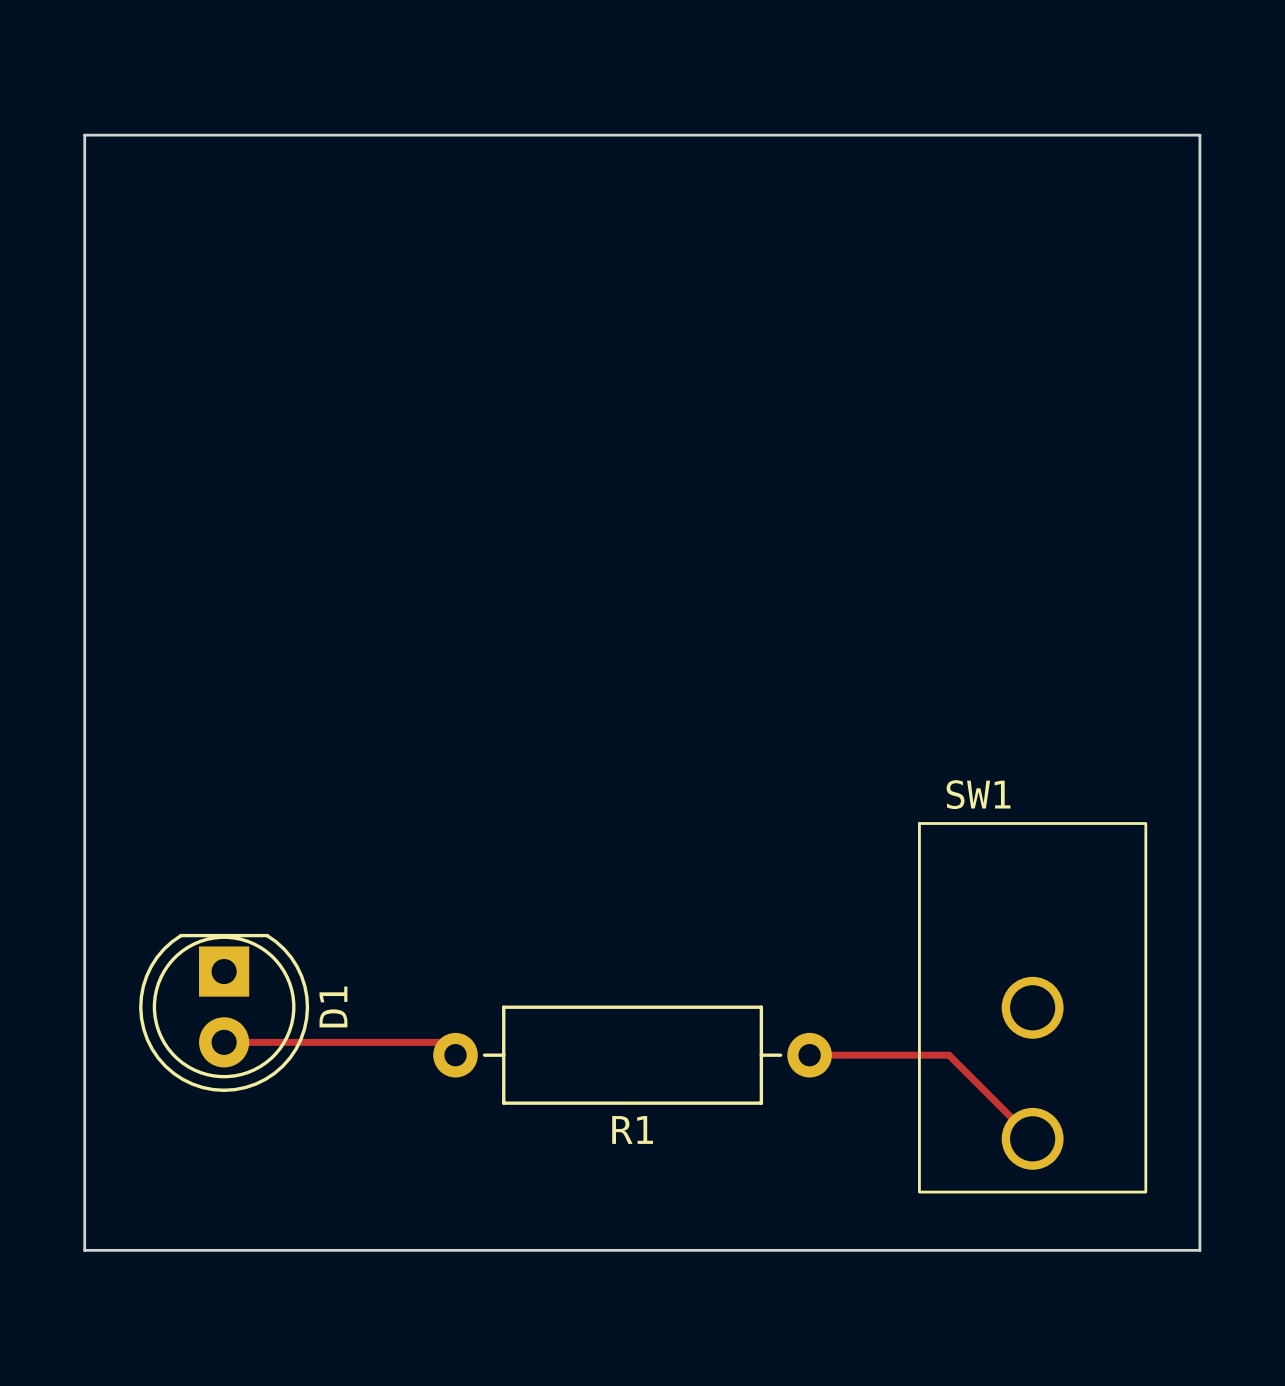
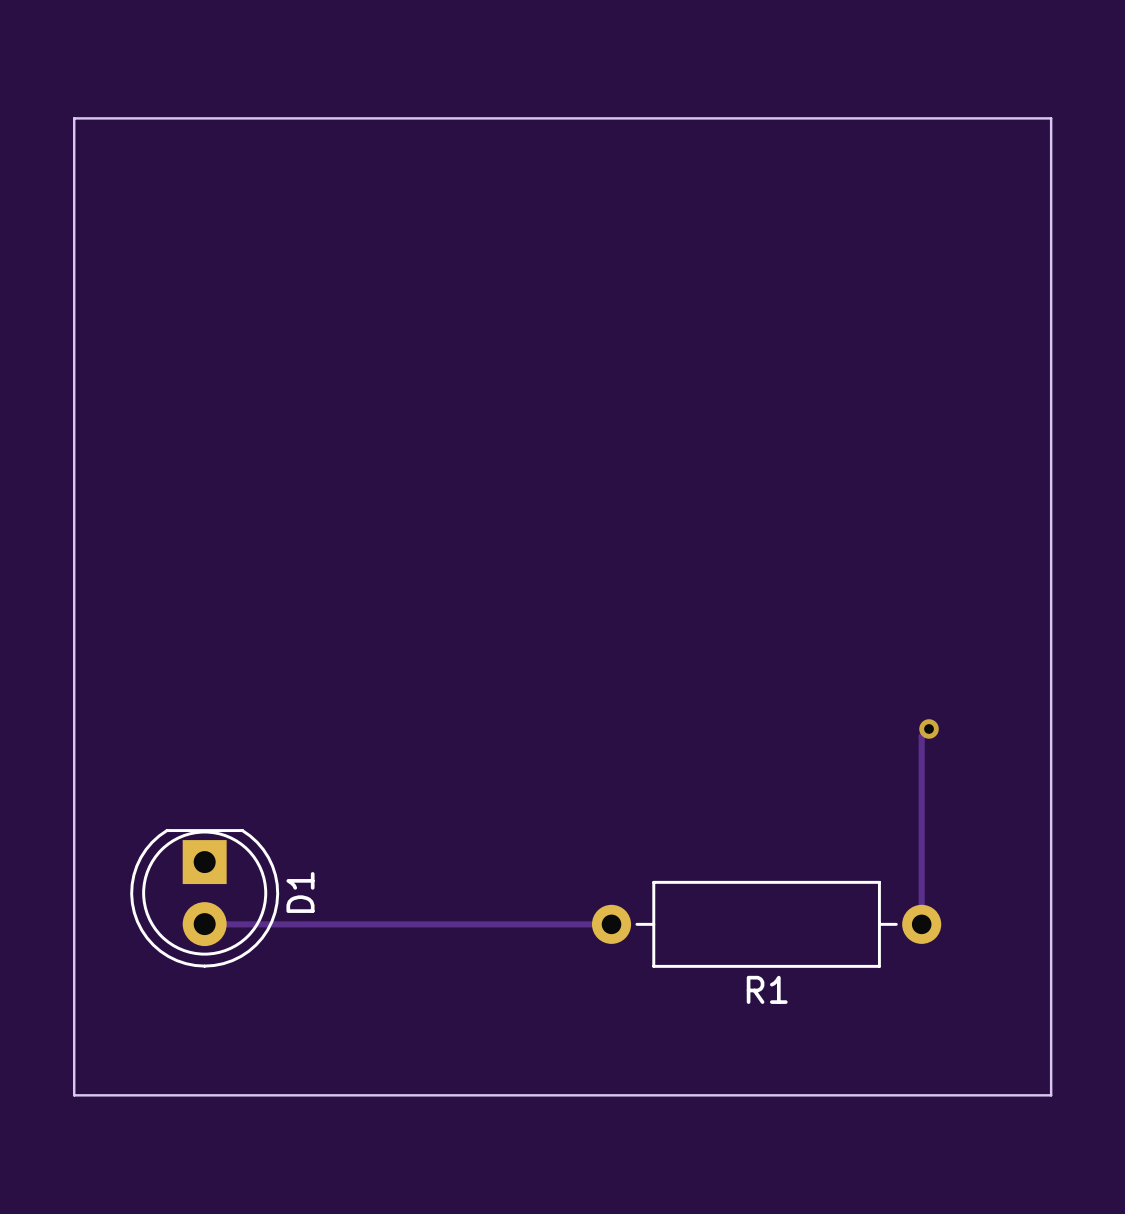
track: none -> (929, 728) (921, 736) (921, 924)
via: none -> (929, 728)
D1 footprint: [139, 933, 310, 1092] -> [130, 829, 280, 968]
D1 name position: D1 (333, 1006) -> D1 (300, 892)
SW1: (1032, 1007) -> none
track: (224, 1042) (442, 1042) (455, 1055) -> none
track: none -> (204, 924) (611, 924)
R1 position: (632, 1055) -> (766, 924)
track: (809, 1055) (948, 1055) (1032, 1138) -> none

